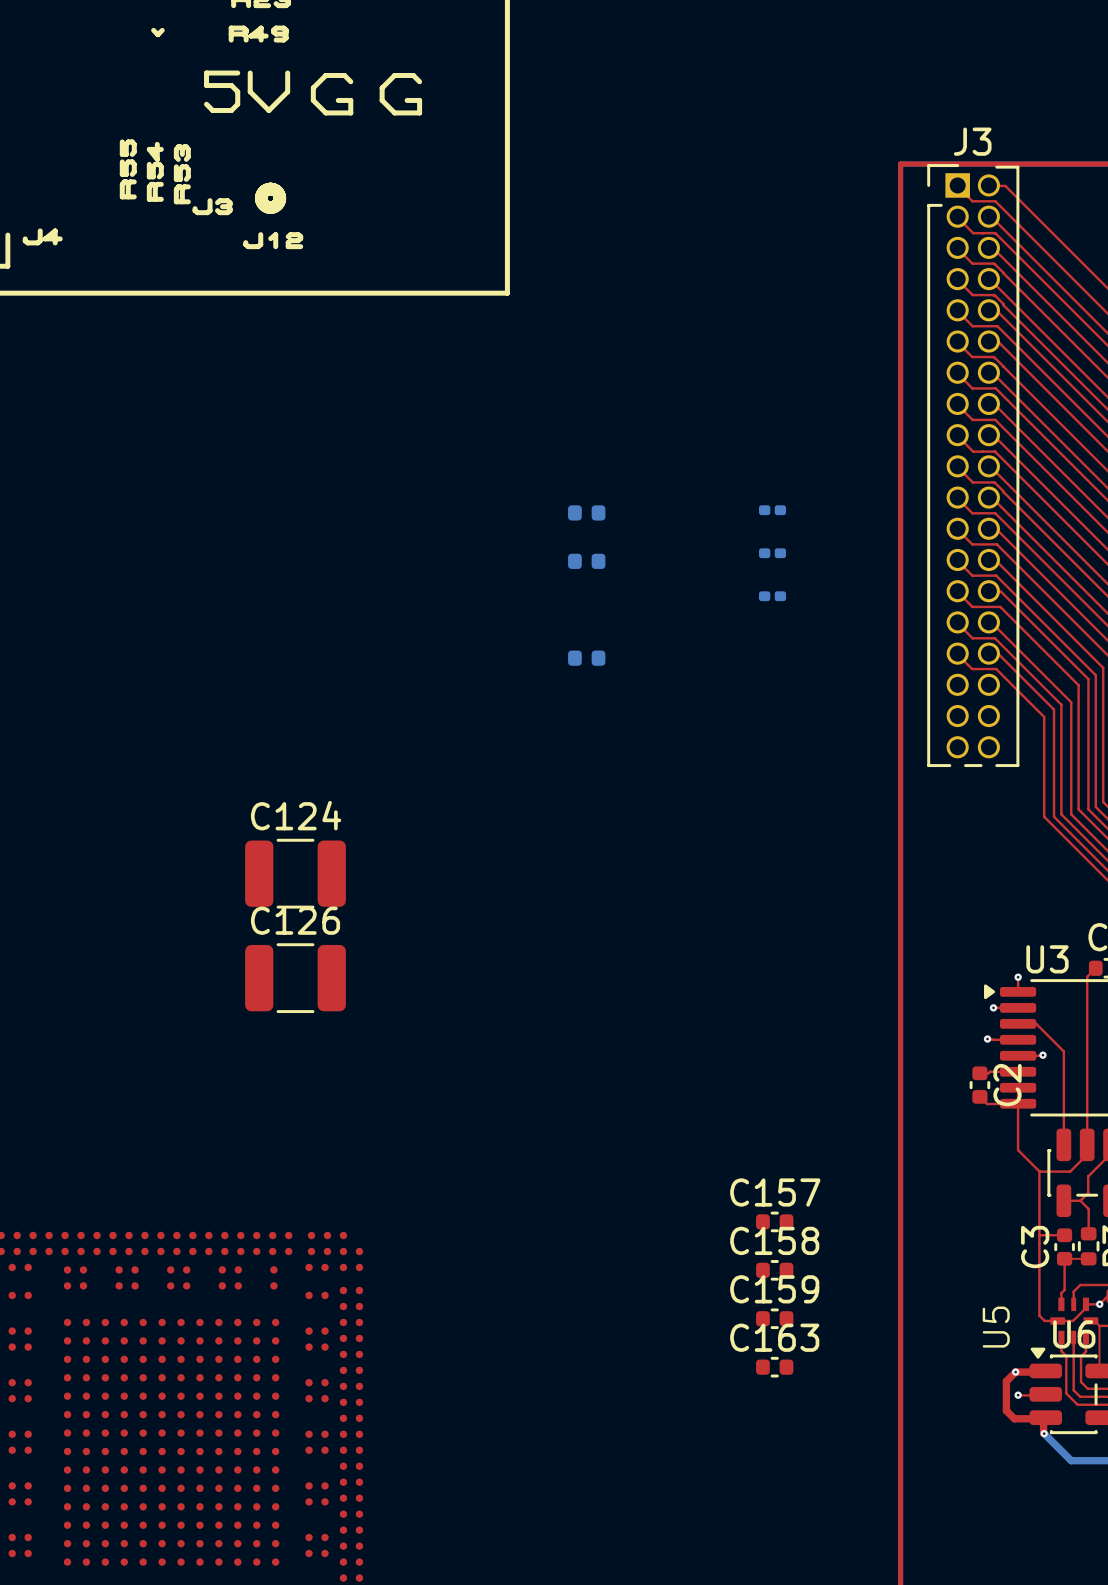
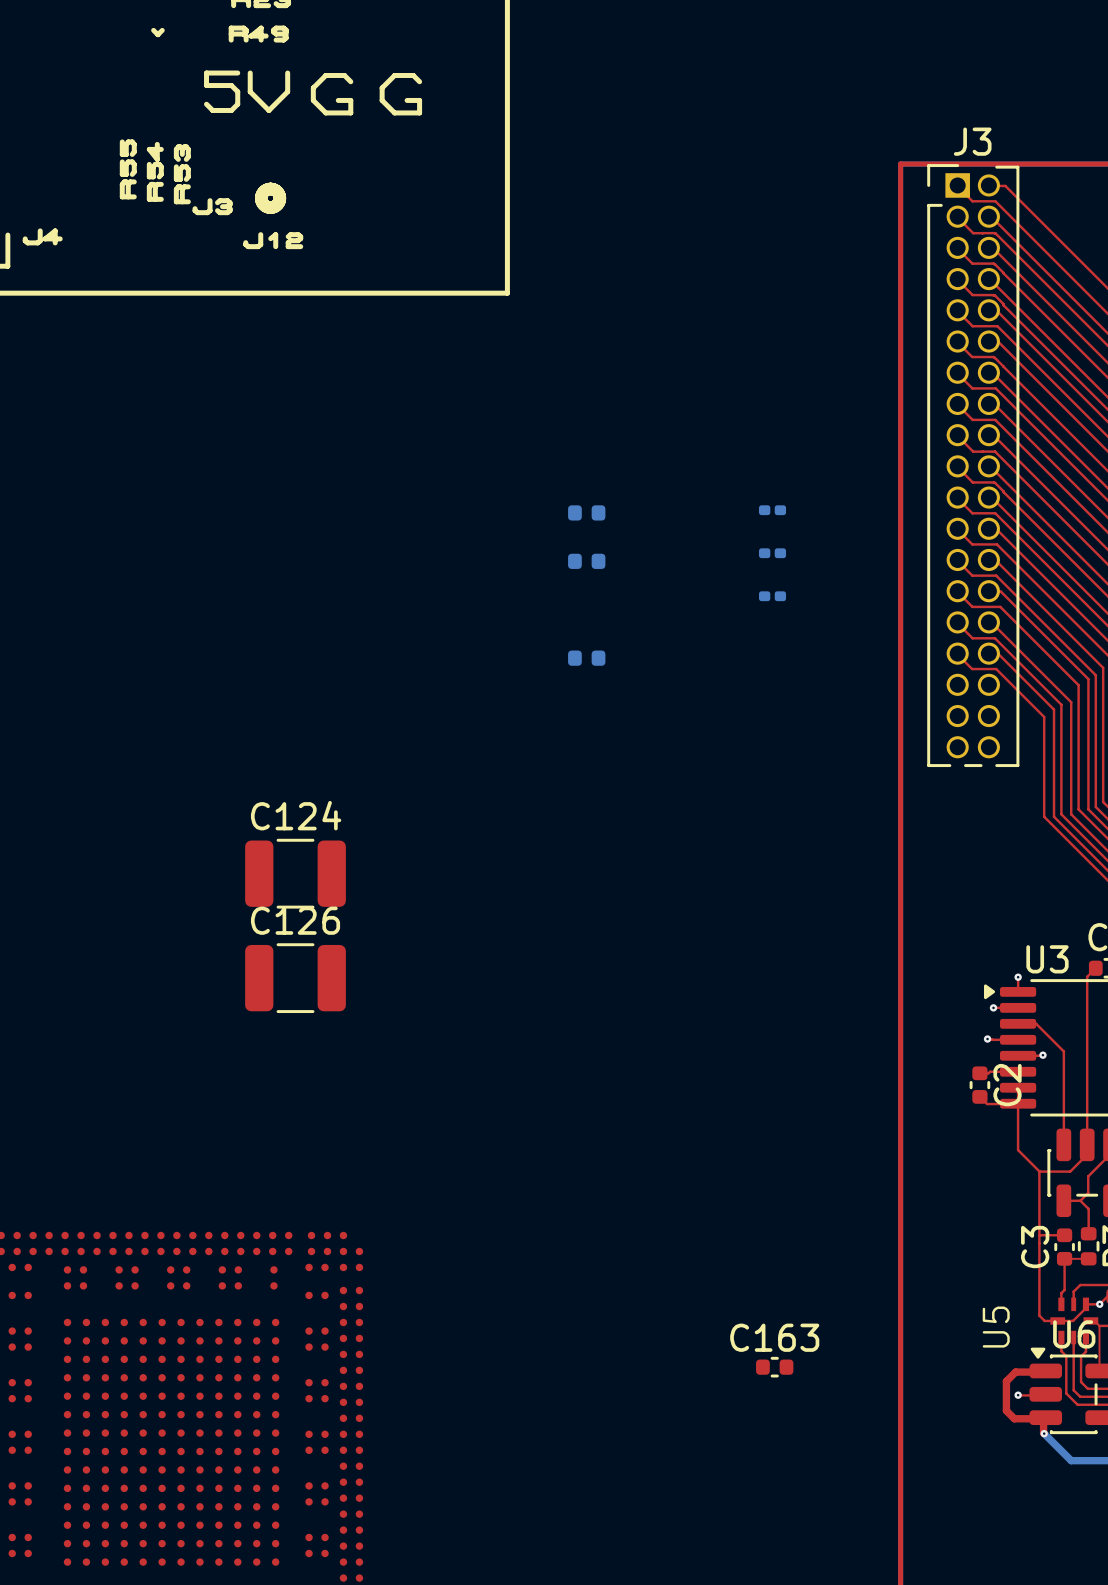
C157: (774, 1221) -> none
C158: (774, 1270) -> none
C159: (774, 1318) -> none
via: (1015, 1372) -> none

